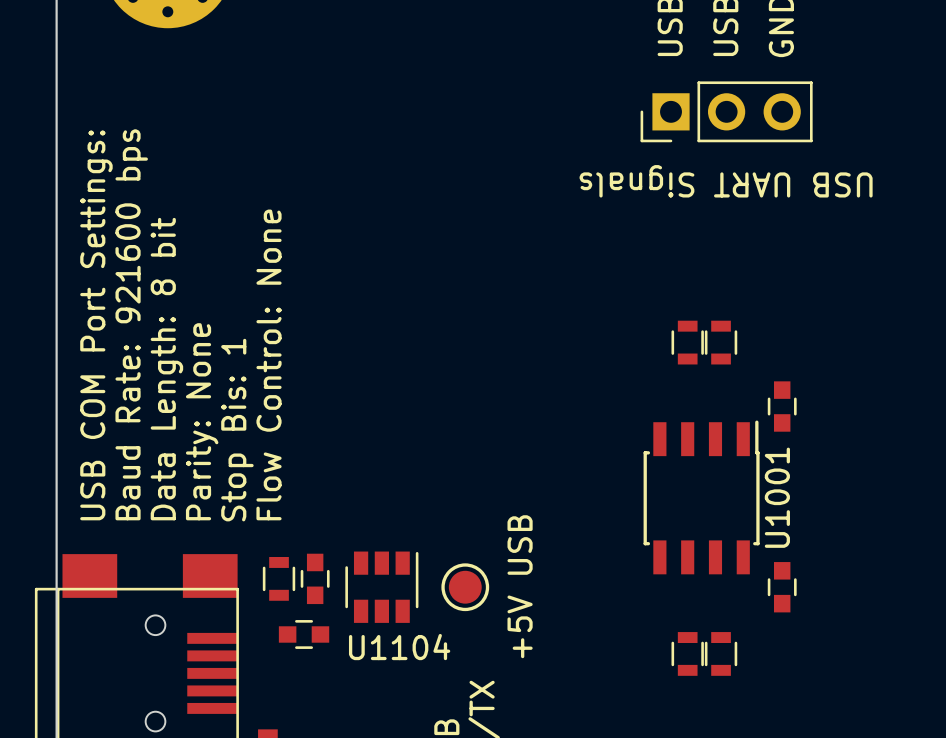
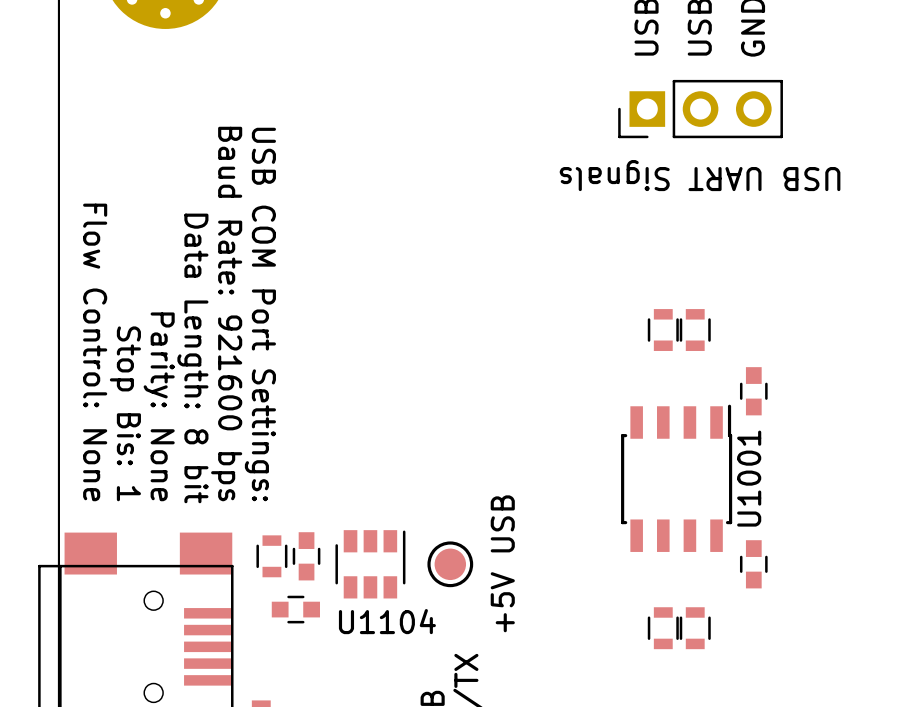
text: Baud Rate: 921600 bps (131, 324) -> Stop Bis: 1 (125, 413)
text: USB COM Port Settings: (96, 325) -> Flow Control: None (95, 352)
text: Flow Control: None (269, 364) -> USB COM Port Settings: (260, 314)
text: Data Length: 8 bit (166, 369) -> Parity: None (159, 406)
text: Parity: None (202, 421) -> Data Length: 8 bit (192, 358)
text: Stop Bis: 1 (237, 430) -> Baud Rate: 921600 bps (226, 314)

